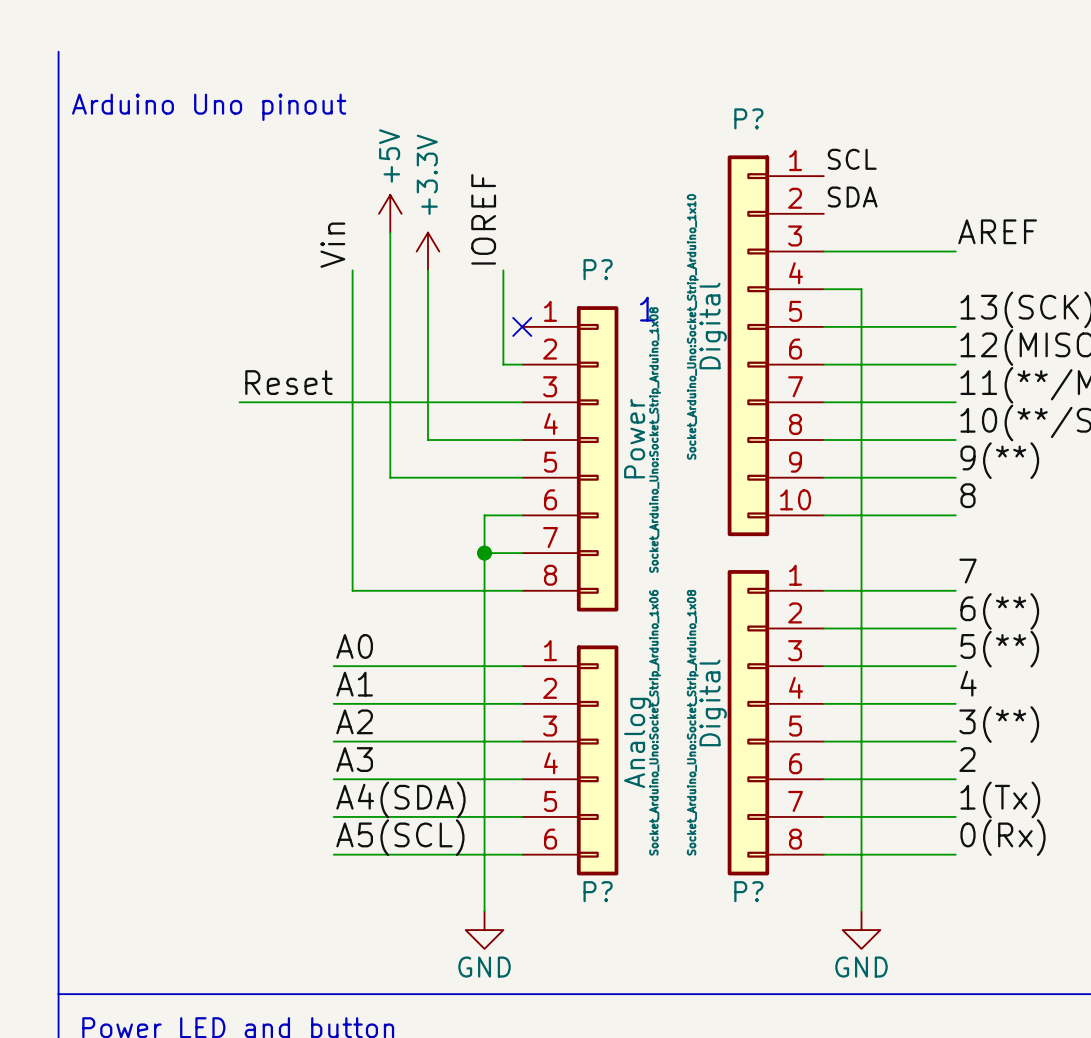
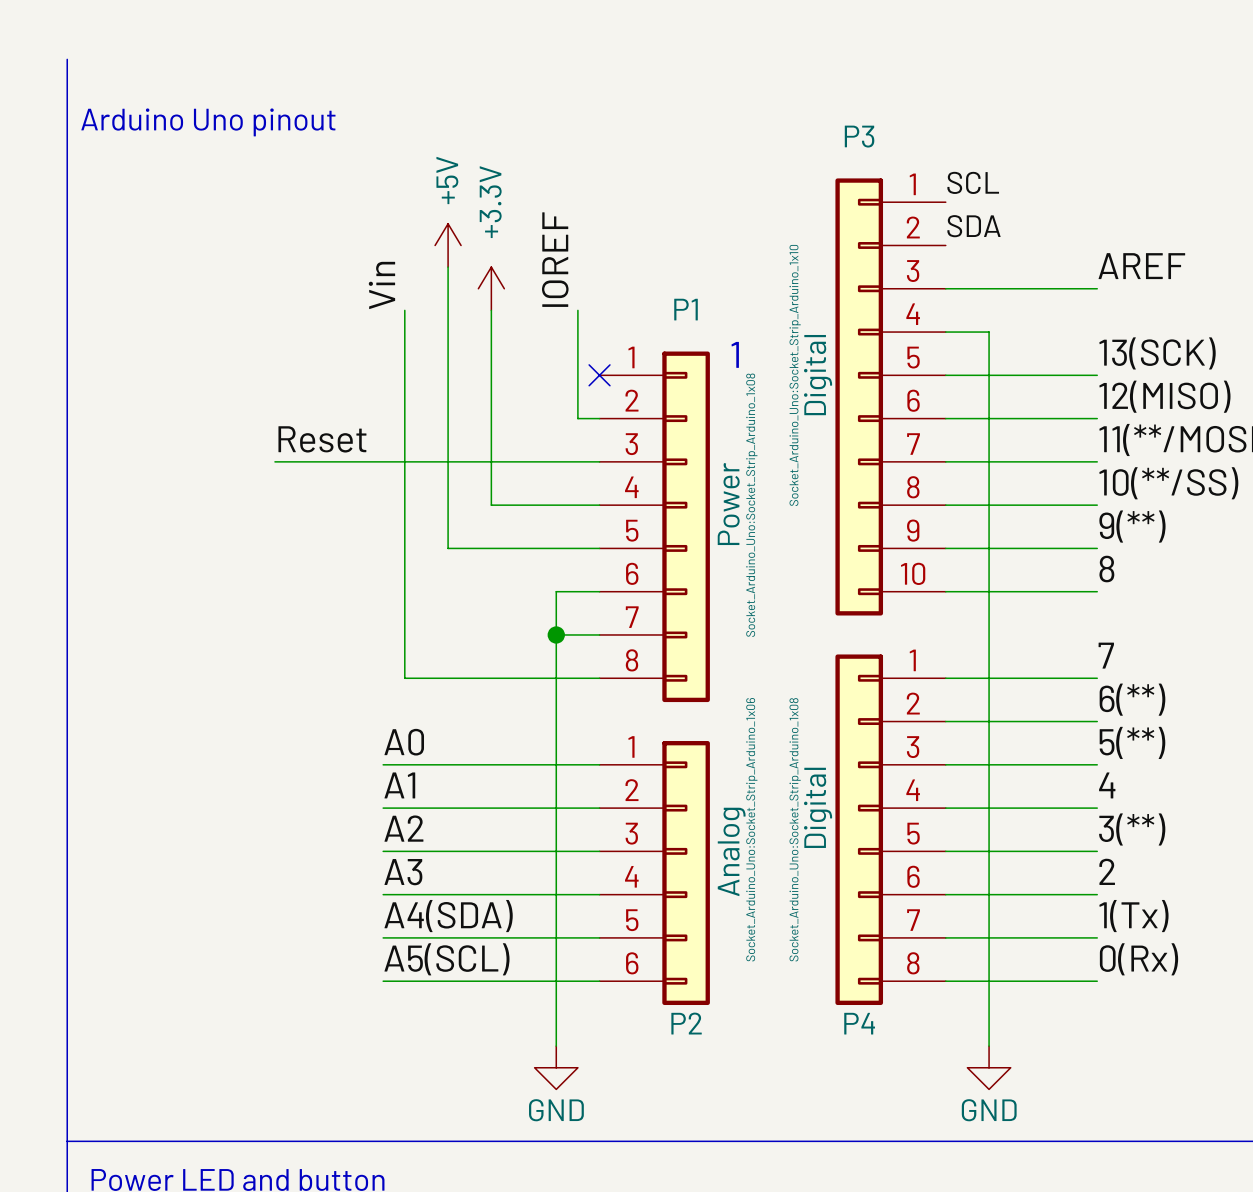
P? name: P? (748, 118) -> P3 (859, 136)
P? name: P? (598, 269) -> P1 (686, 309)
P? name: P? (598, 891) -> P2 (686, 1023)
P? name: P? (748, 891) -> P4 (859, 1023)

